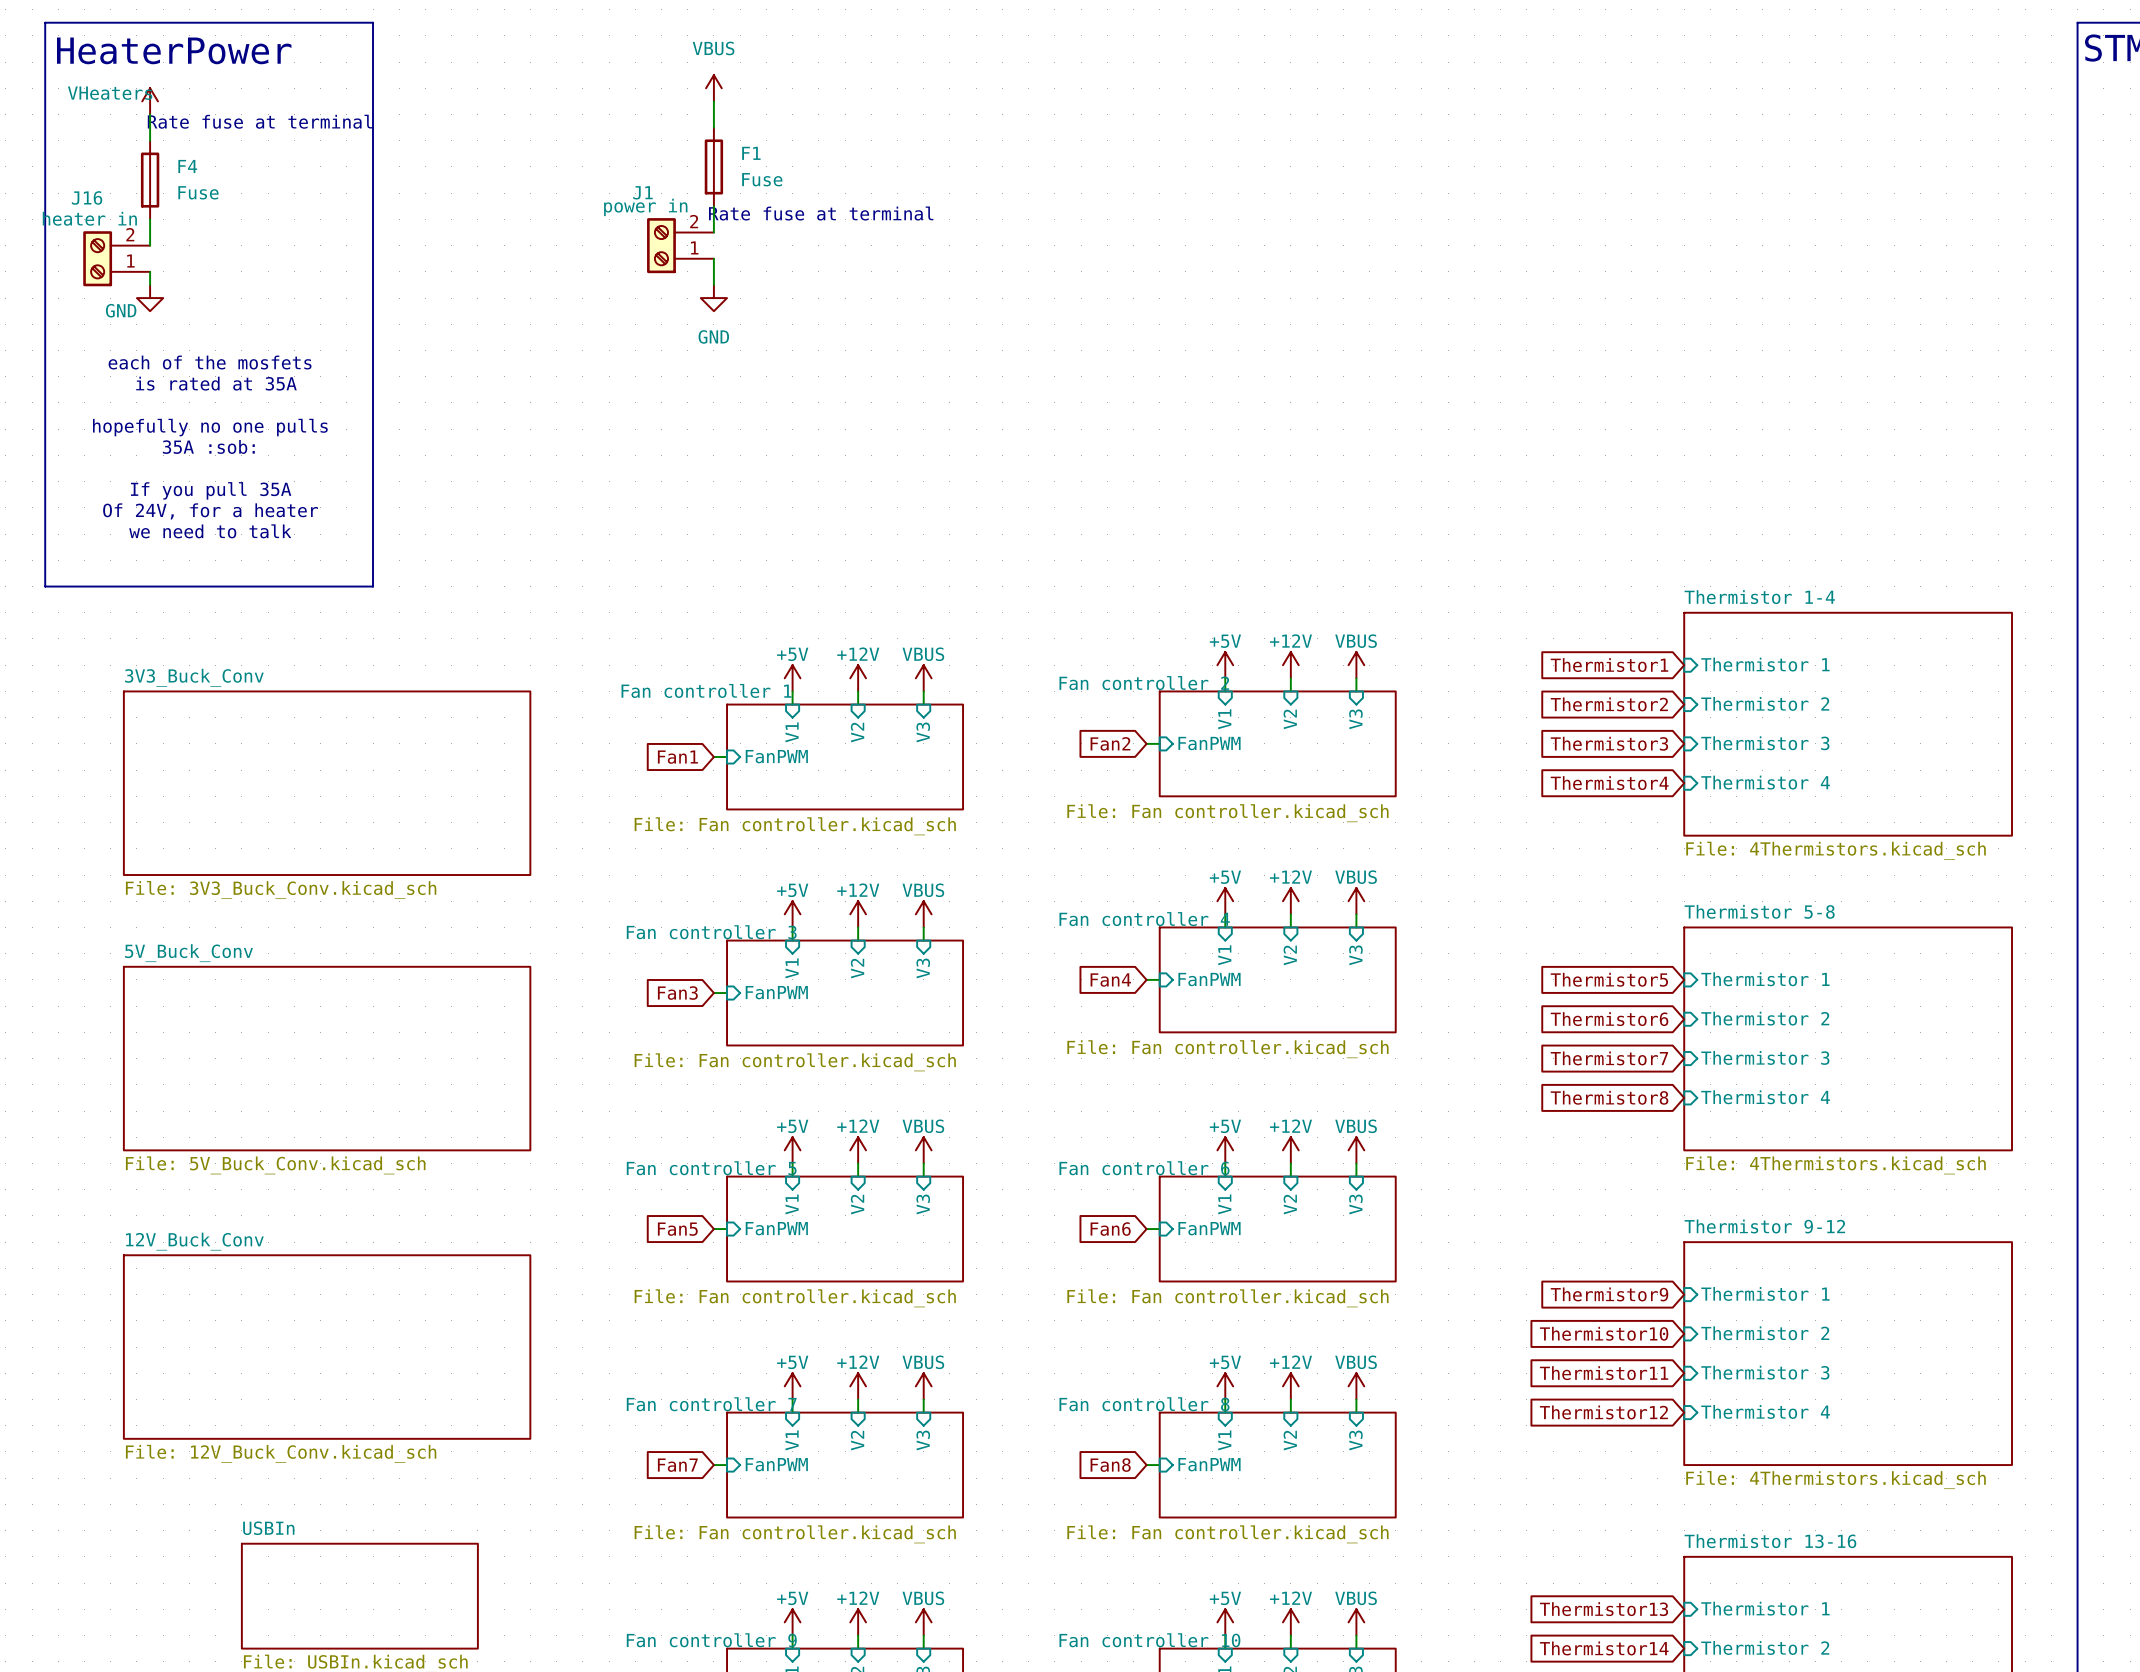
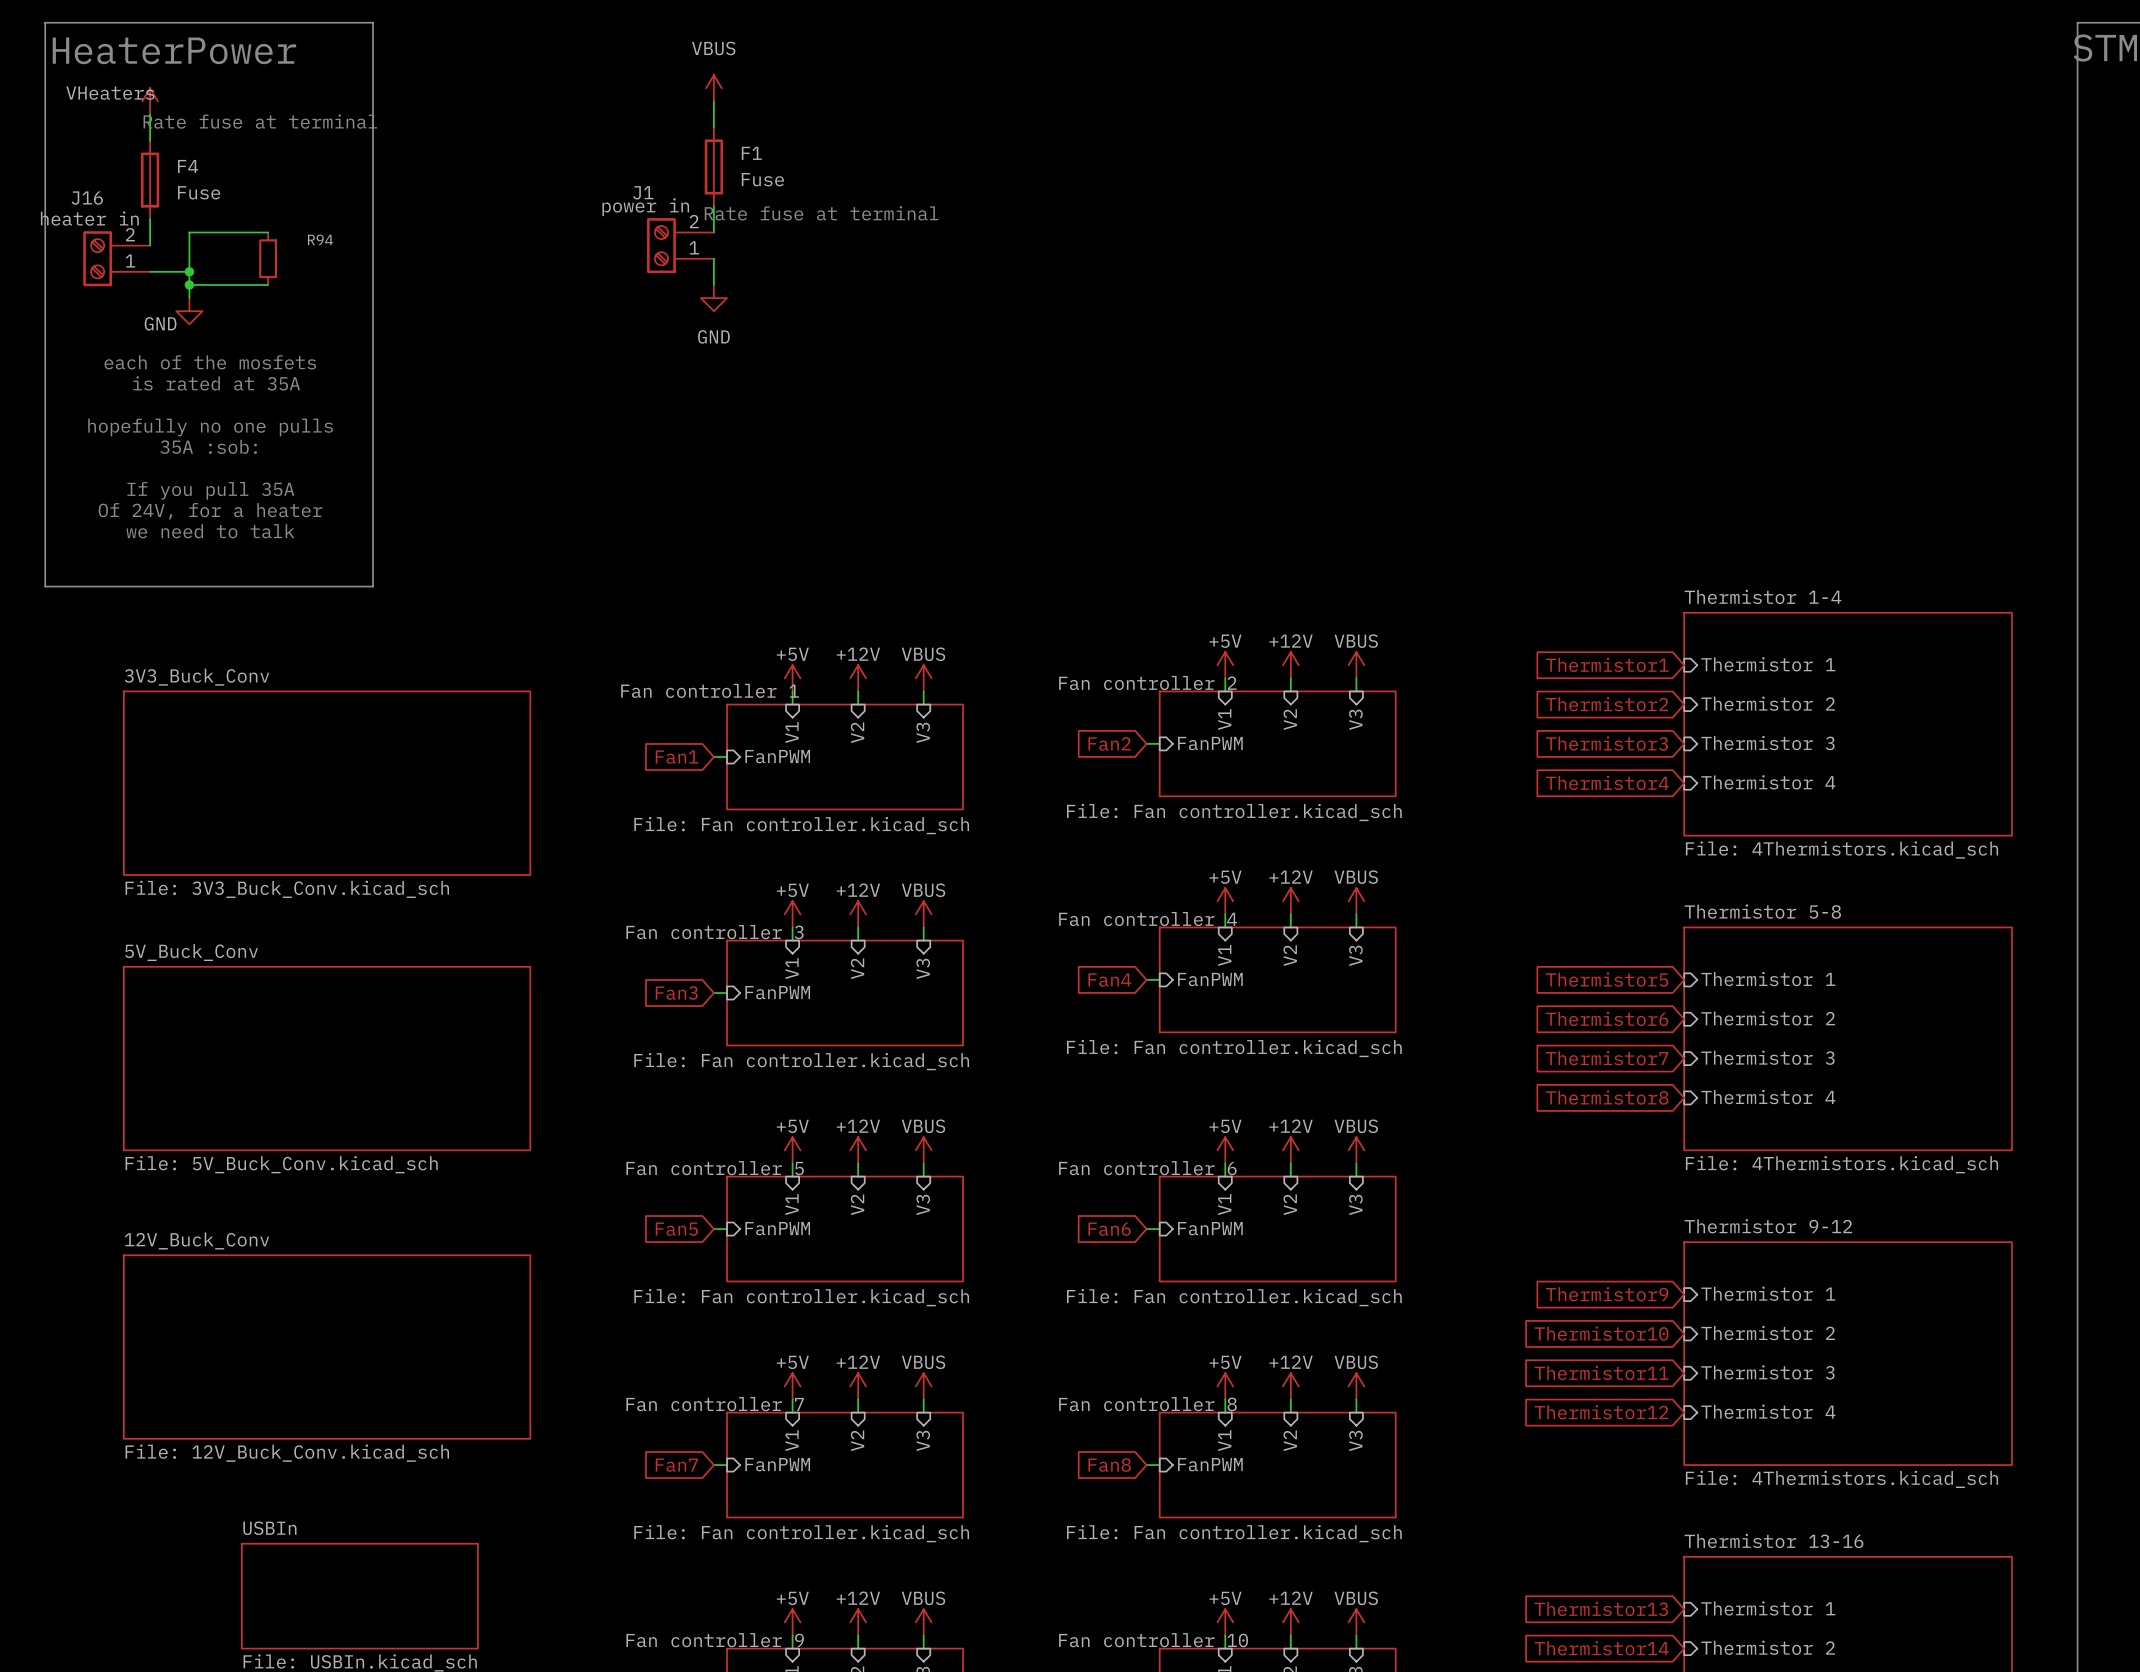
wire: none -> (268, 232) (189, 232) (189, 298)
R94: none -> (268, 258)
wire: (150, 271) (150, 284) -> (150, 271) (189, 271)
junction: none -> (189, 271)
wire: none -> (189, 284) (268, 284)
junction: none -> (189, 284)
power symbol position: GND (150, 298) -> GND (189, 311)

